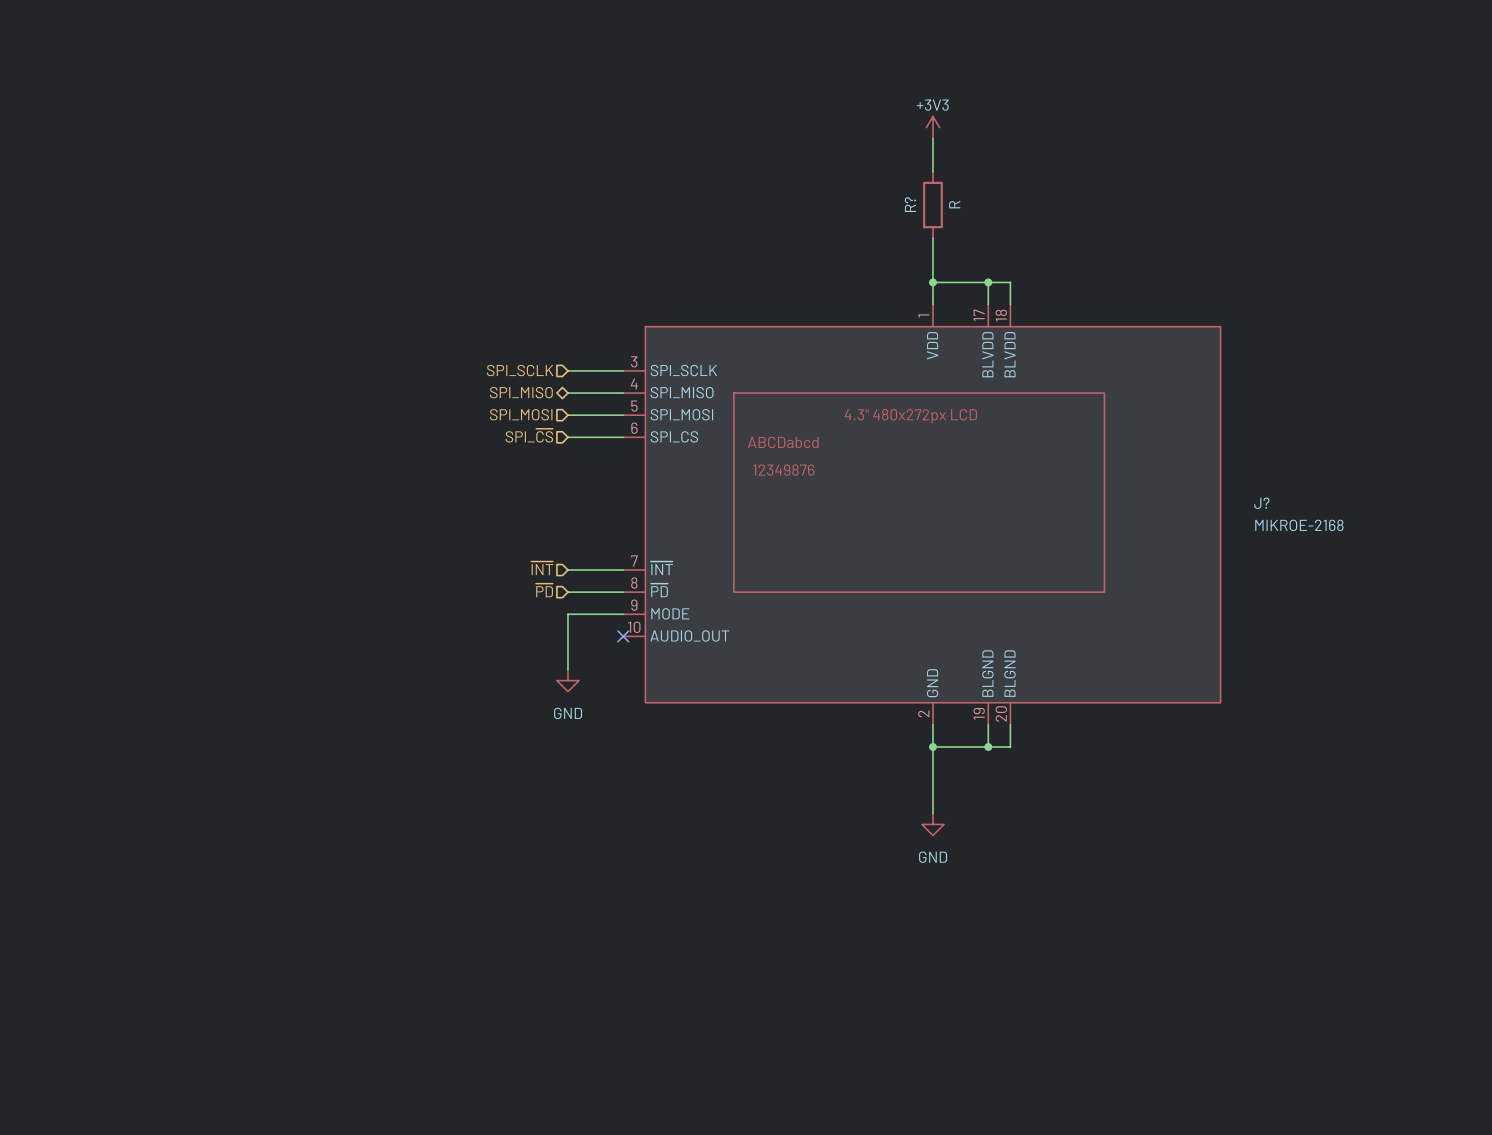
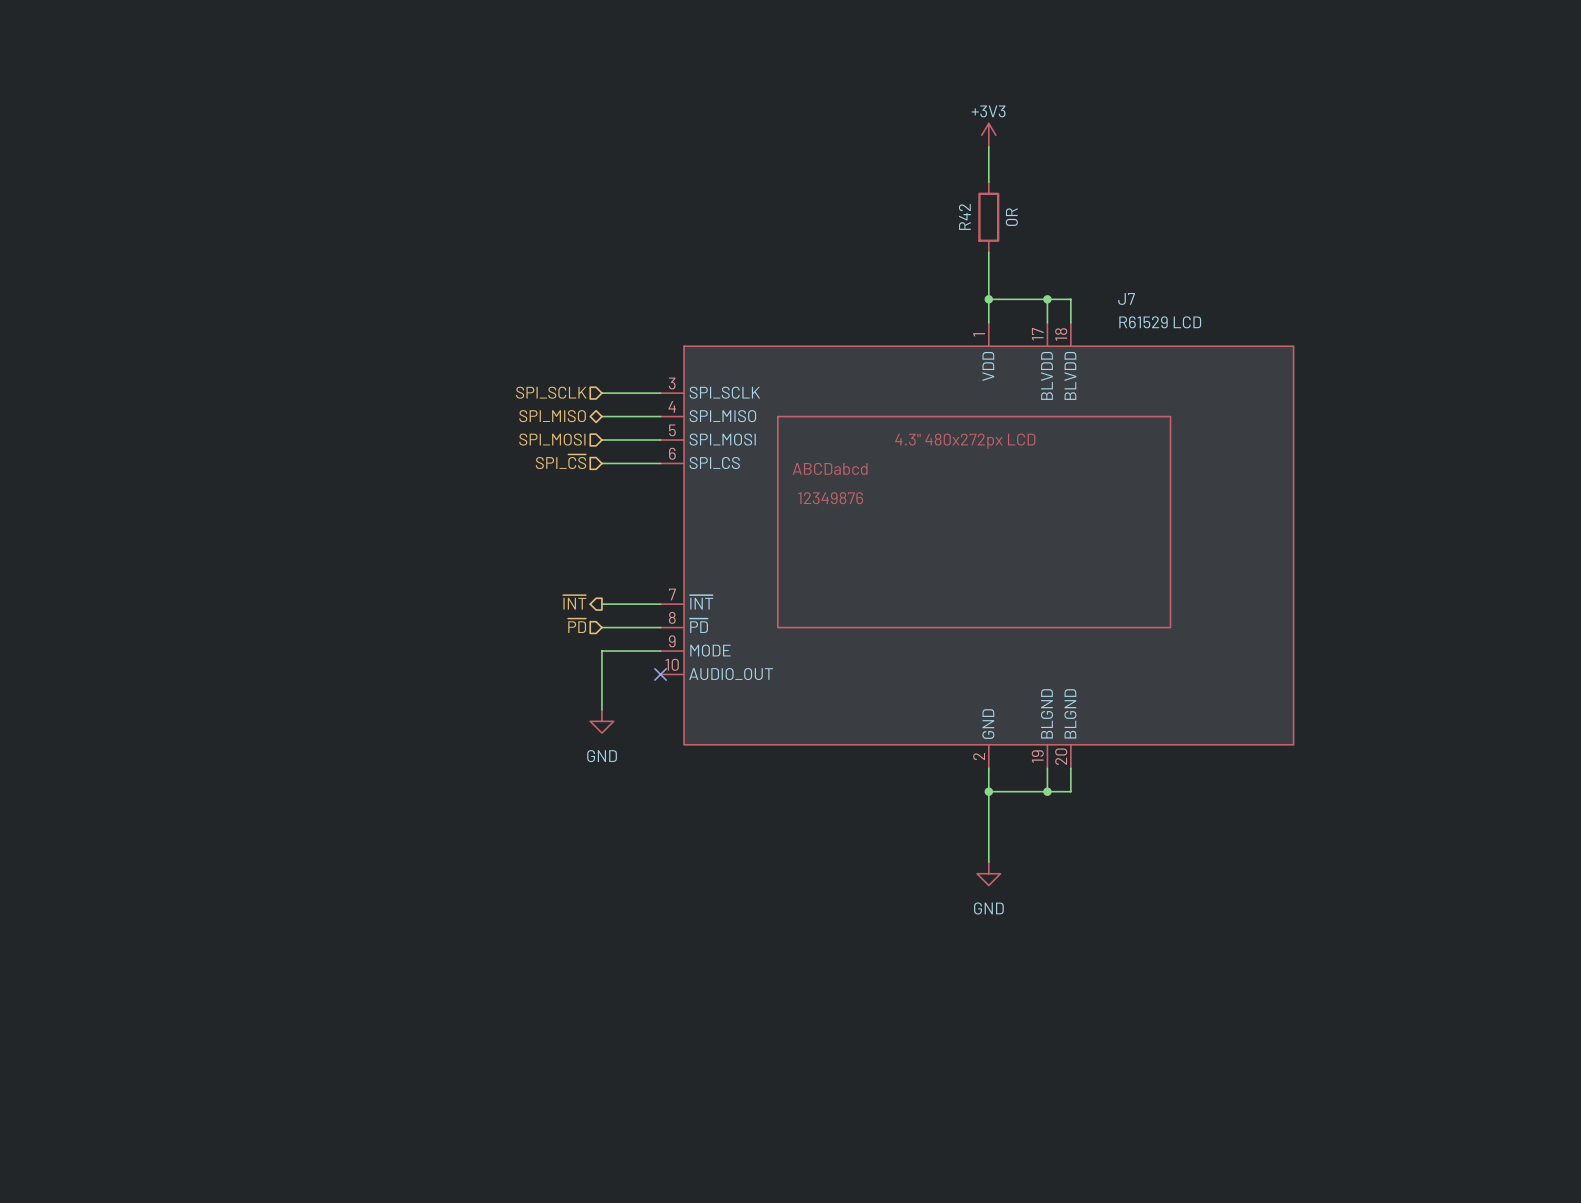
R? name: R? (910, 204) -> R42 (964, 216)
R? value: R (954, 204) -> 0R (1011, 217)
J? name: J? (1261, 503) -> J7 (1126, 298)
J? value: MIKROE-2168 (1299, 525) -> R61529 LCD (1160, 322)
hierarchical label shape: input (542, 568) -> output (574, 602)

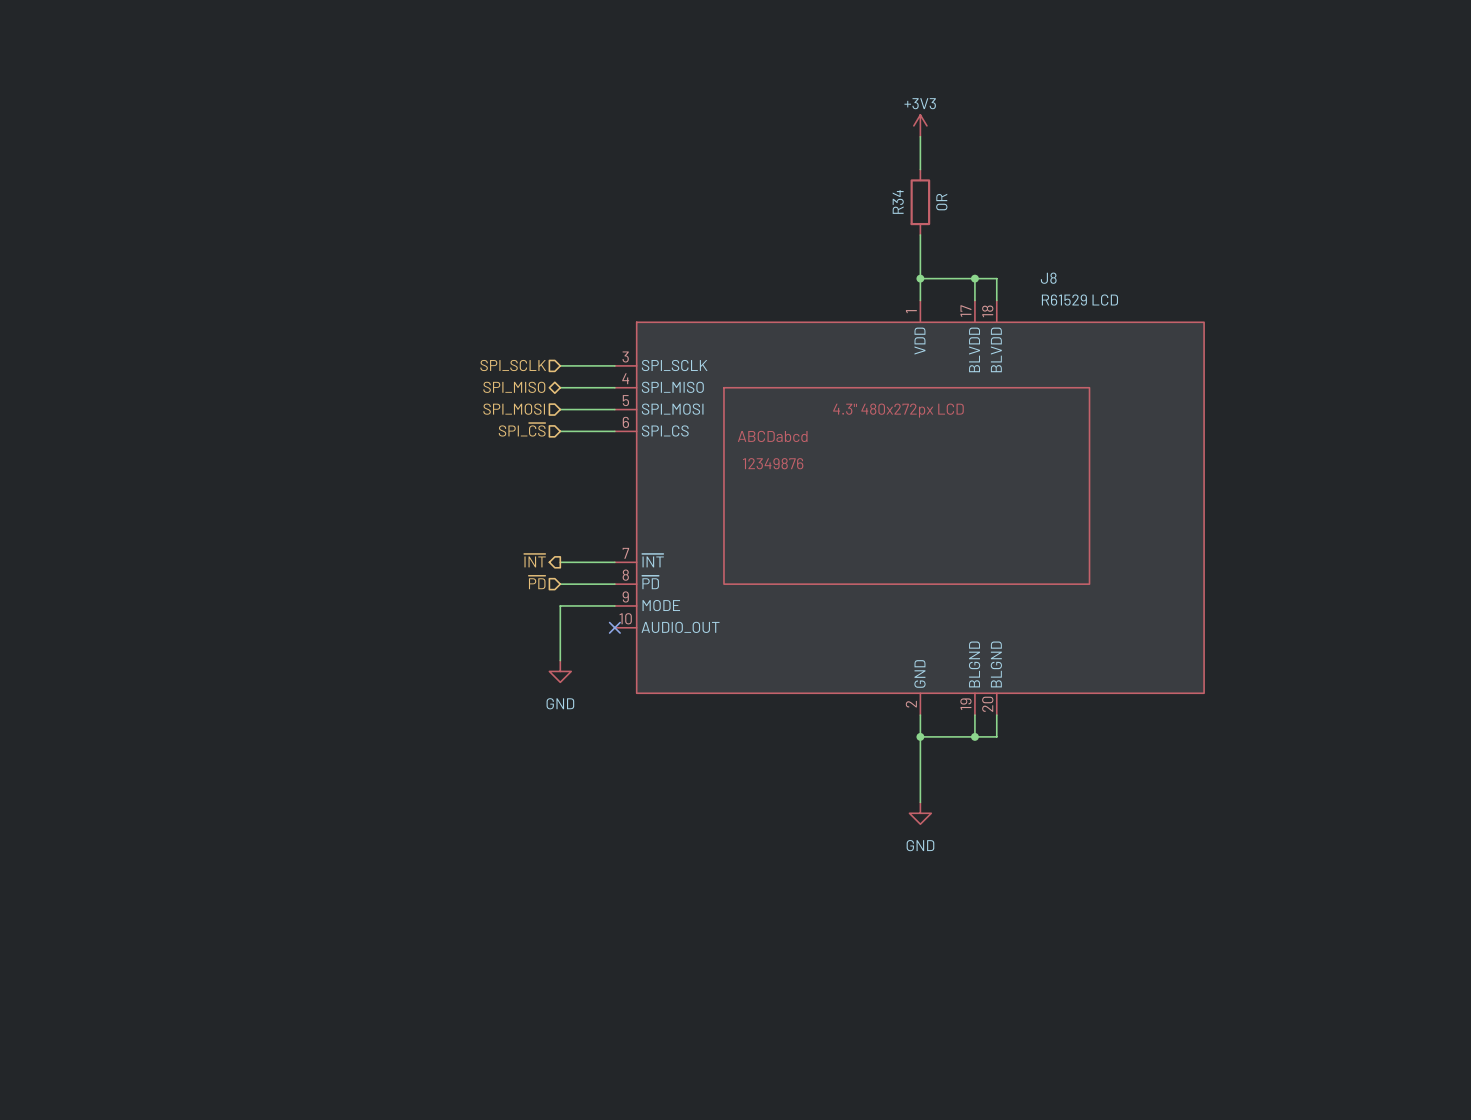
R42 name: R42 (964, 216) -> R34 (898, 201)
J7 name: J7 (1126, 298) -> J8 (1048, 278)

